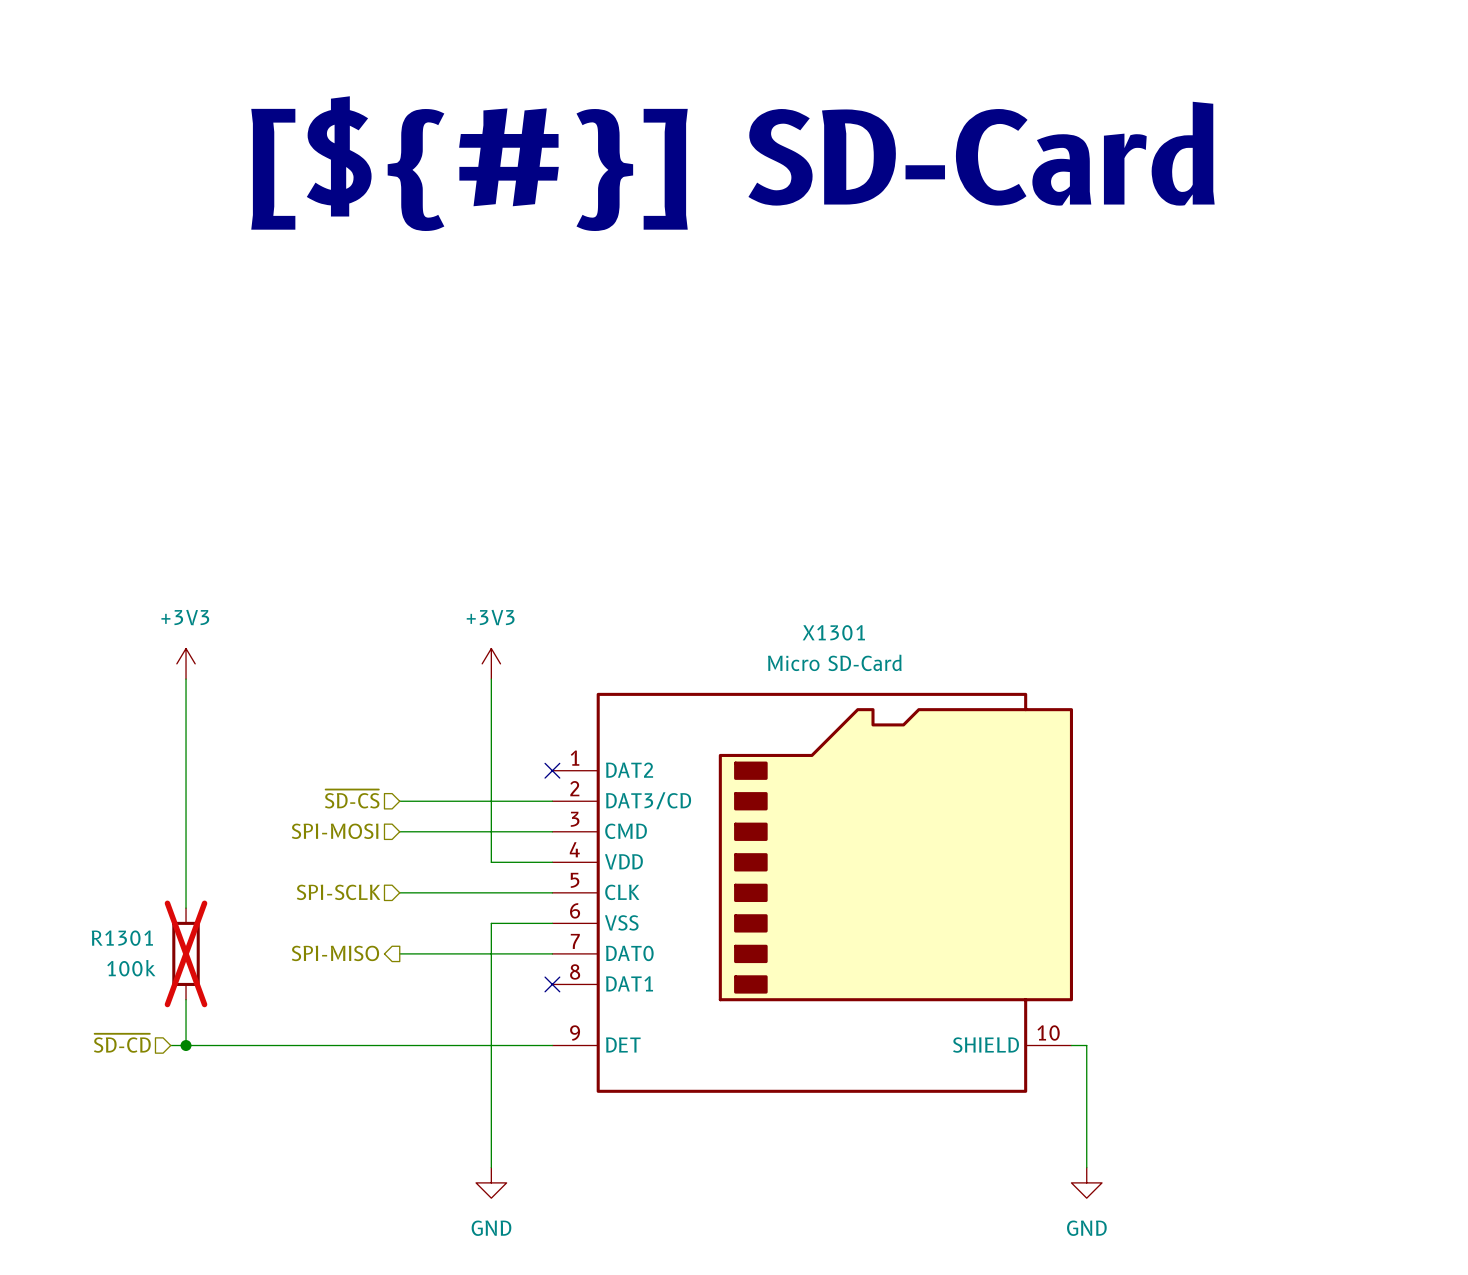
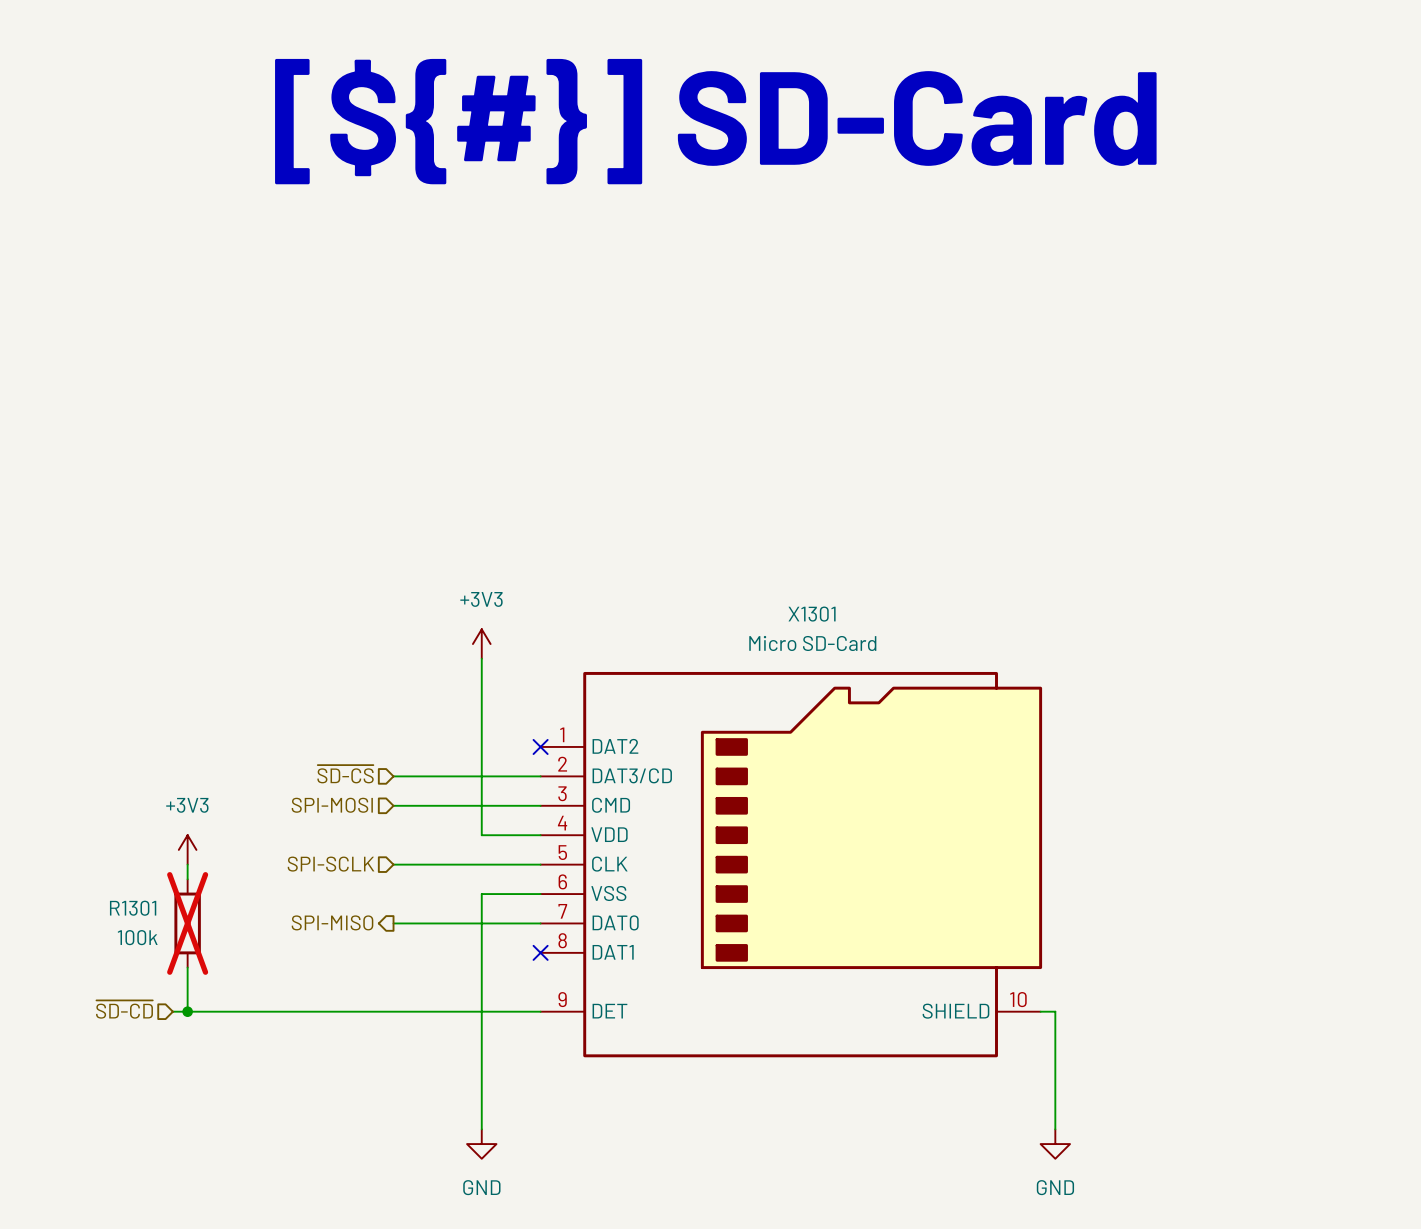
text position: [${#}] SD-Card (732, 163) -> [${#}] SD-Card (715, 121)
power symbol position: +3V3 (186, 663) -> +3V3 (187, 849)
wire: (186, 679) (186, 892) -> none

